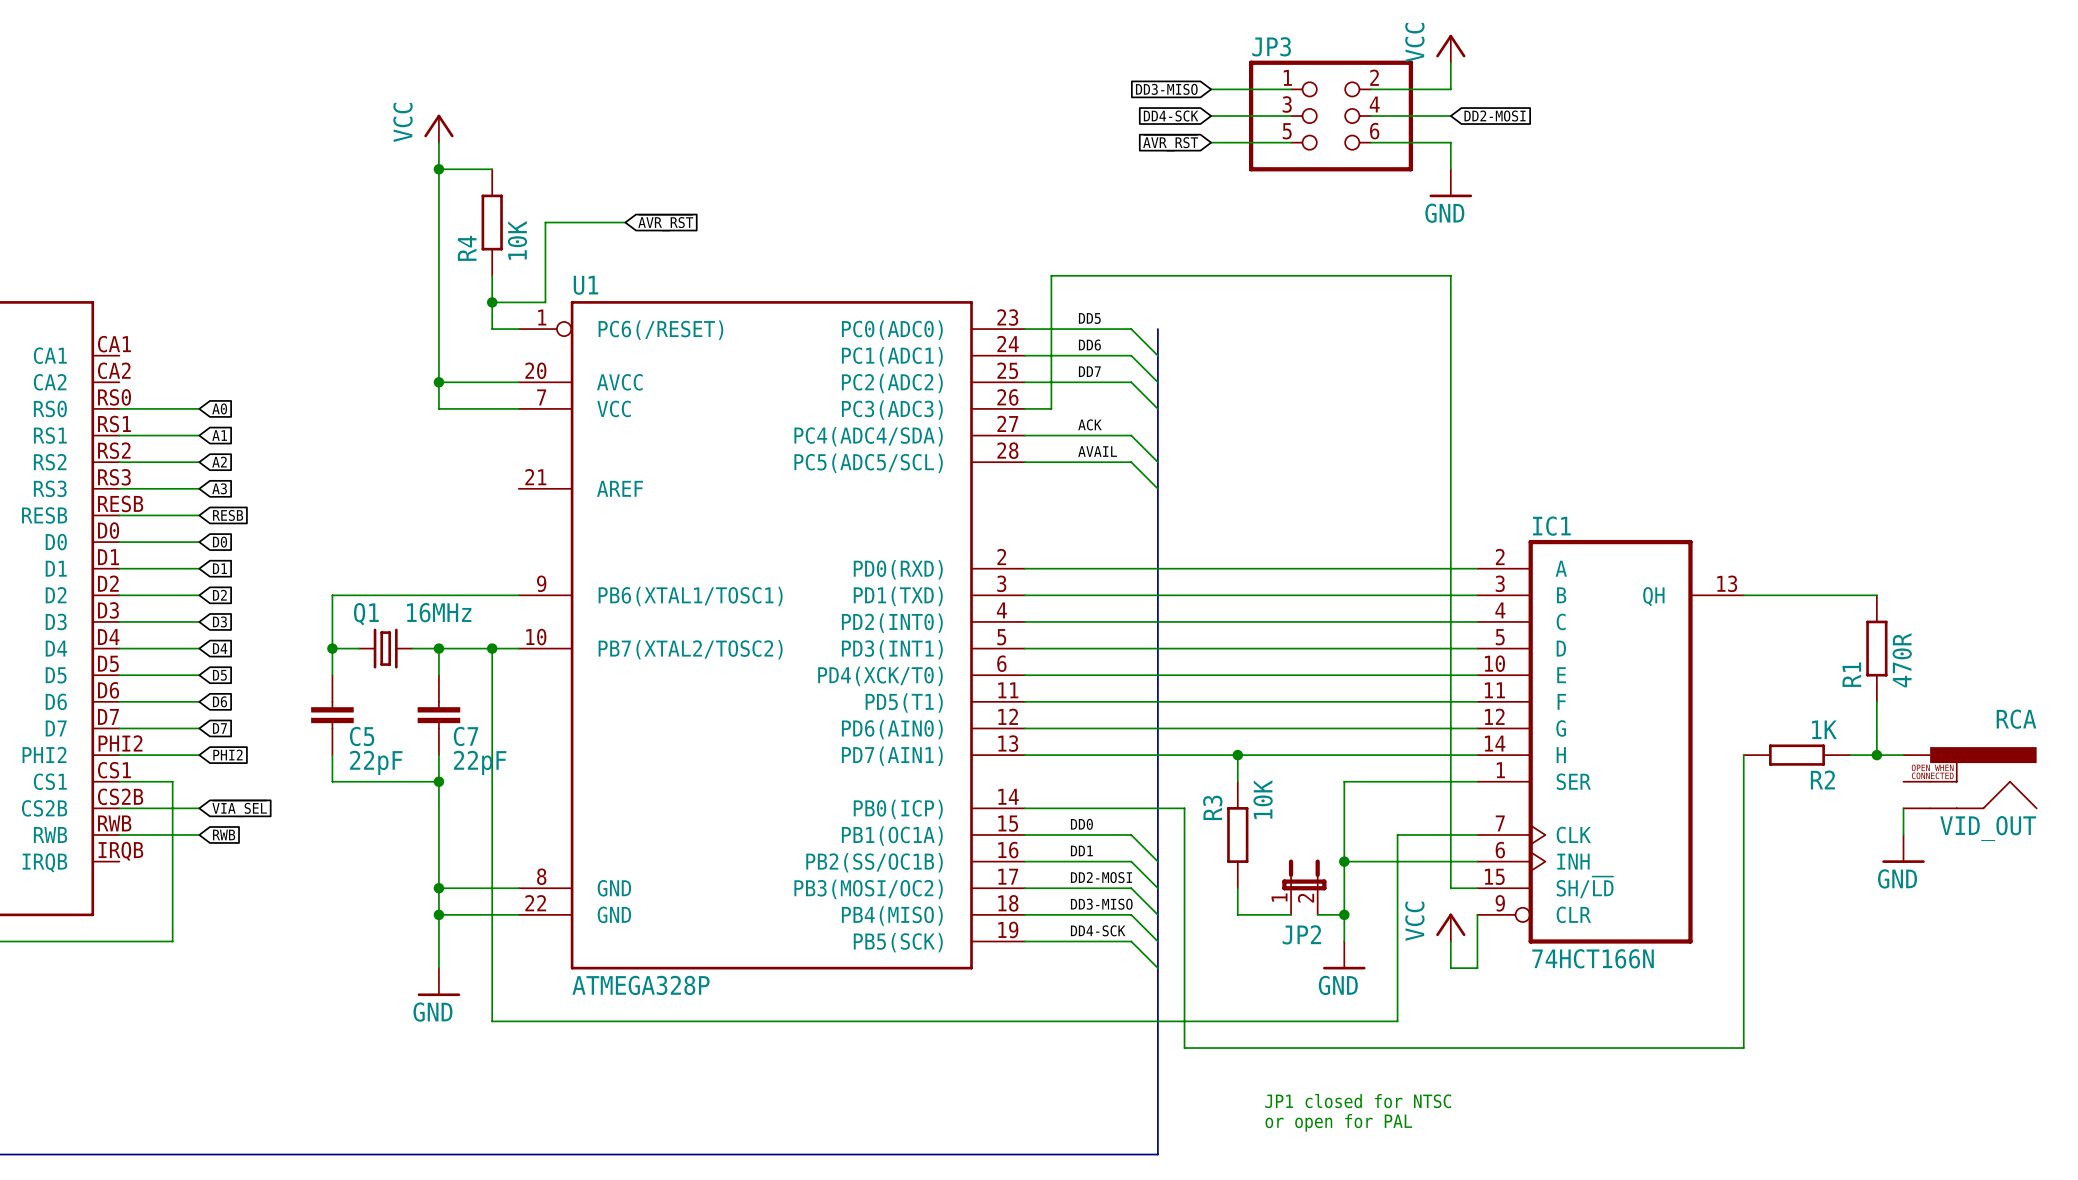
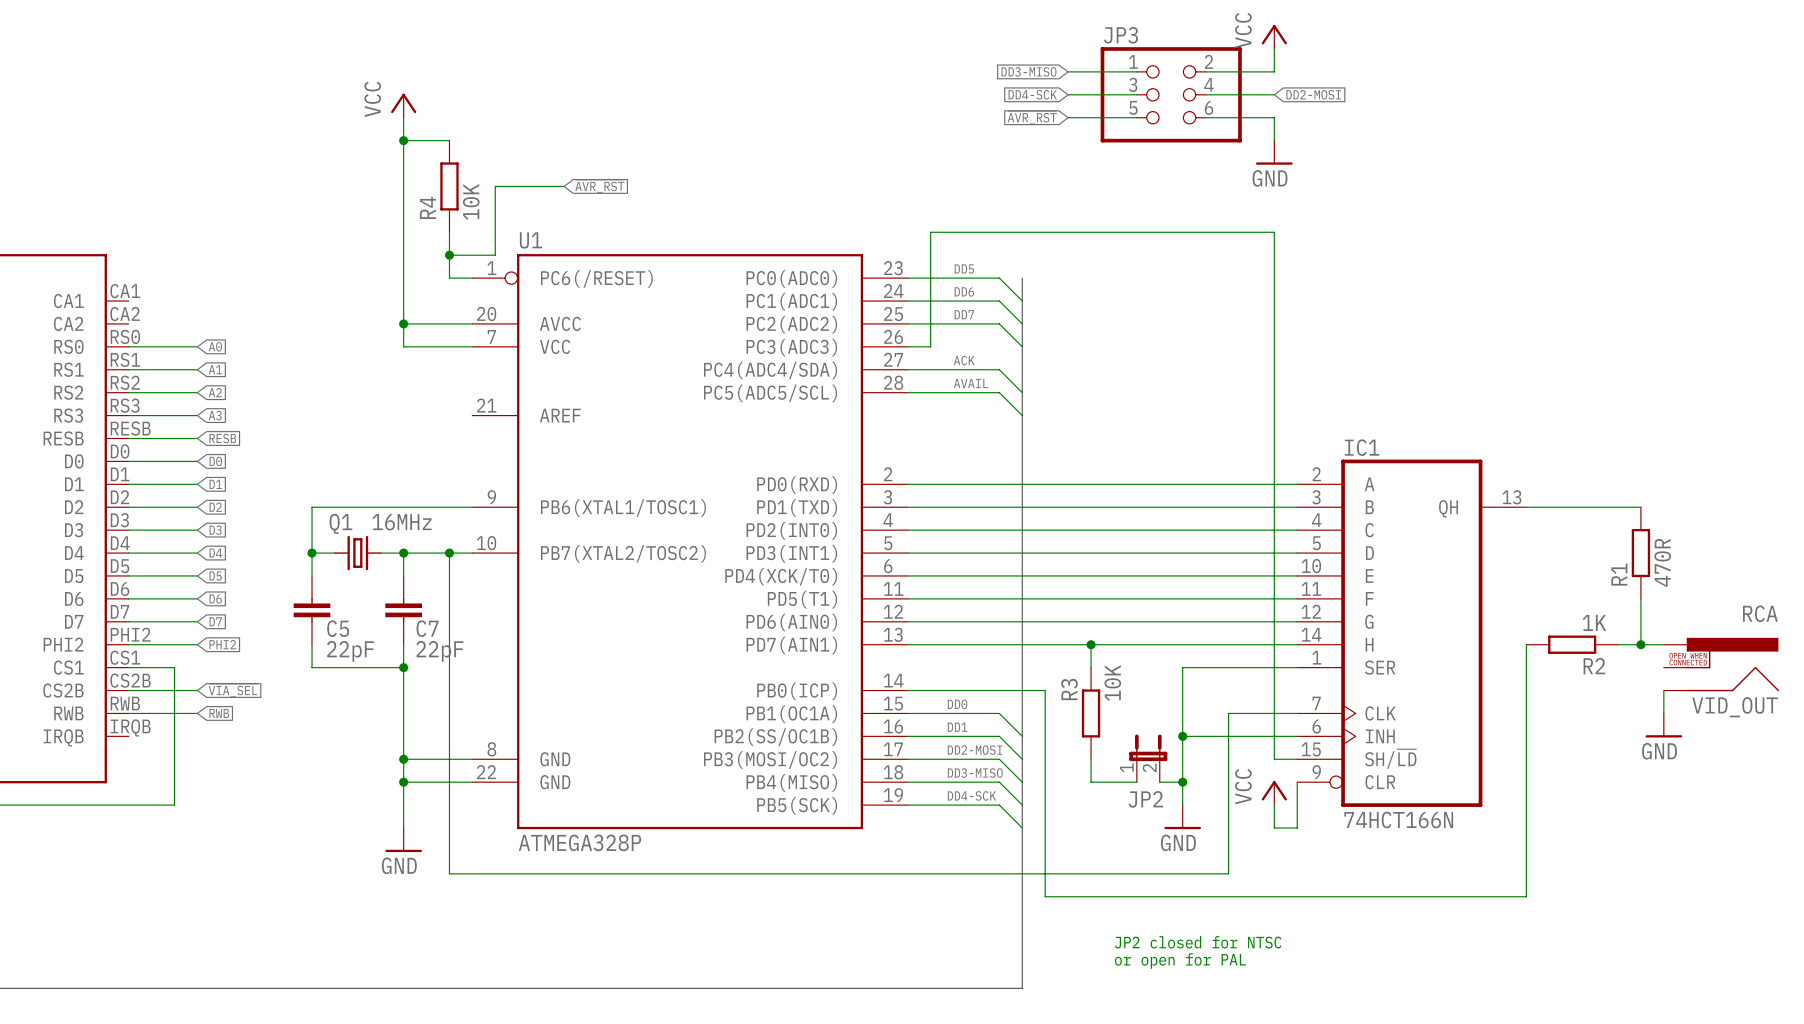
text: JP1 closed for NTSC (1358, 1101) -> JP2 closed for NTSC (1198, 942)

